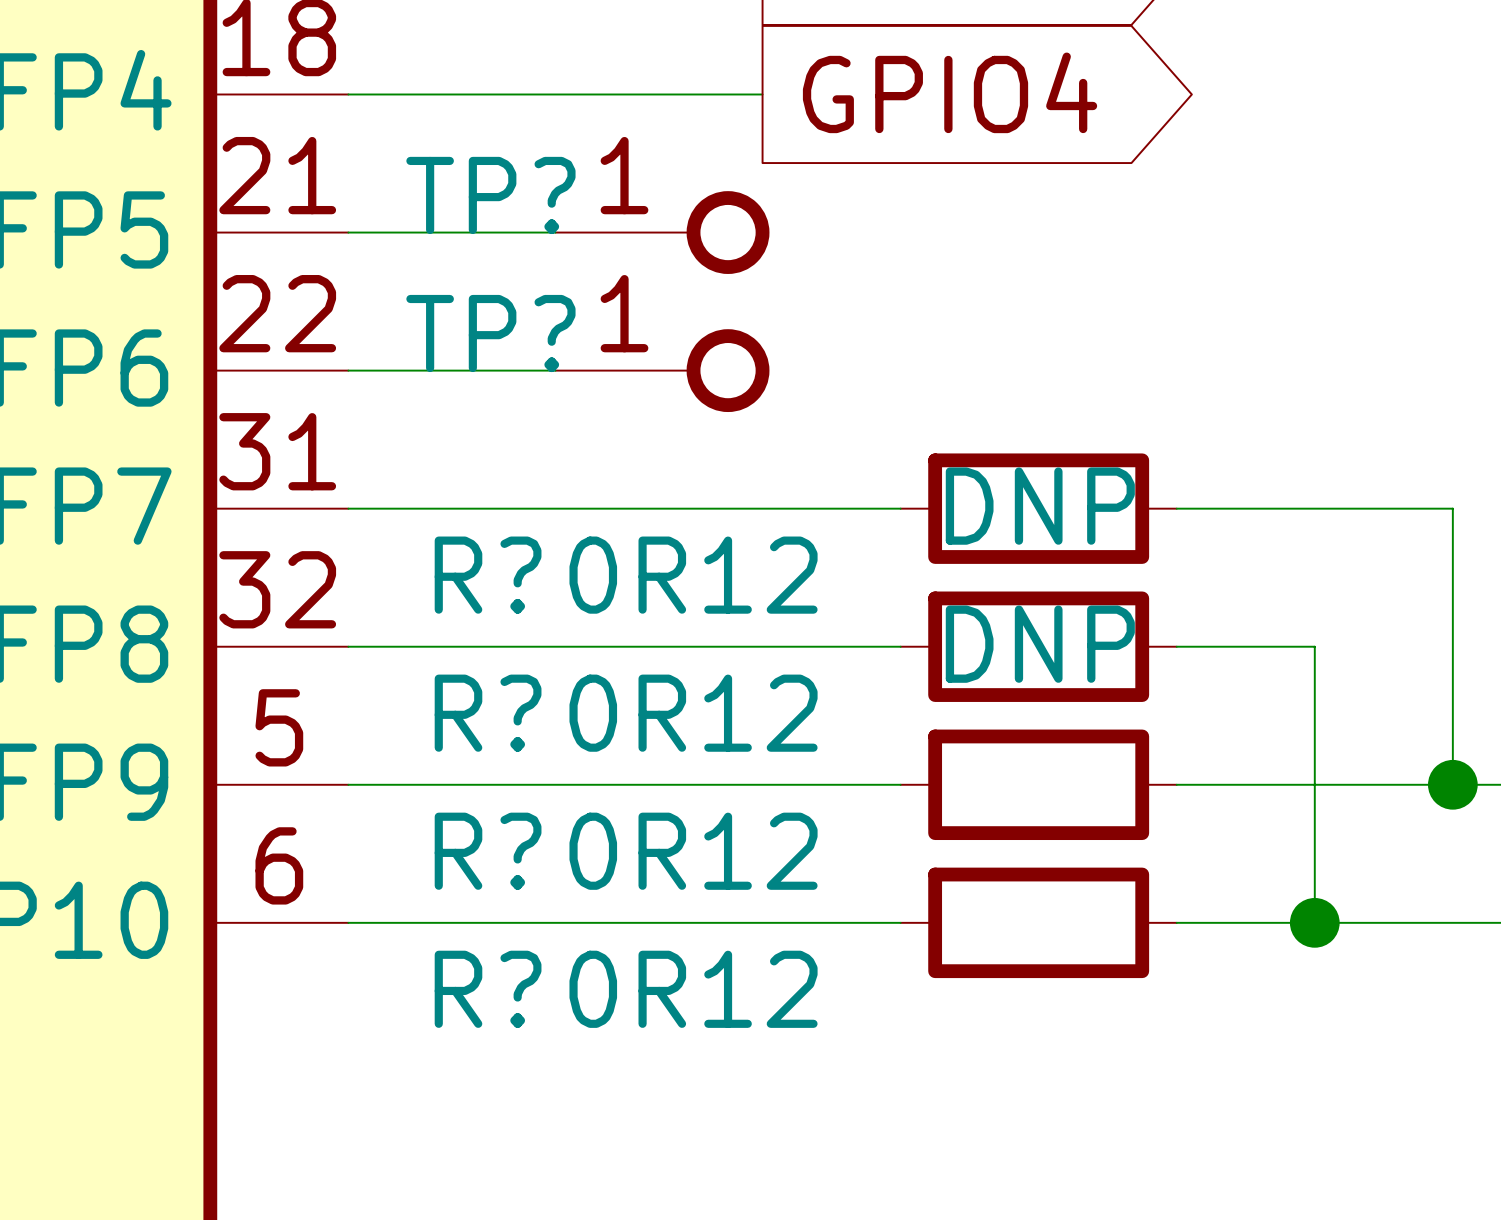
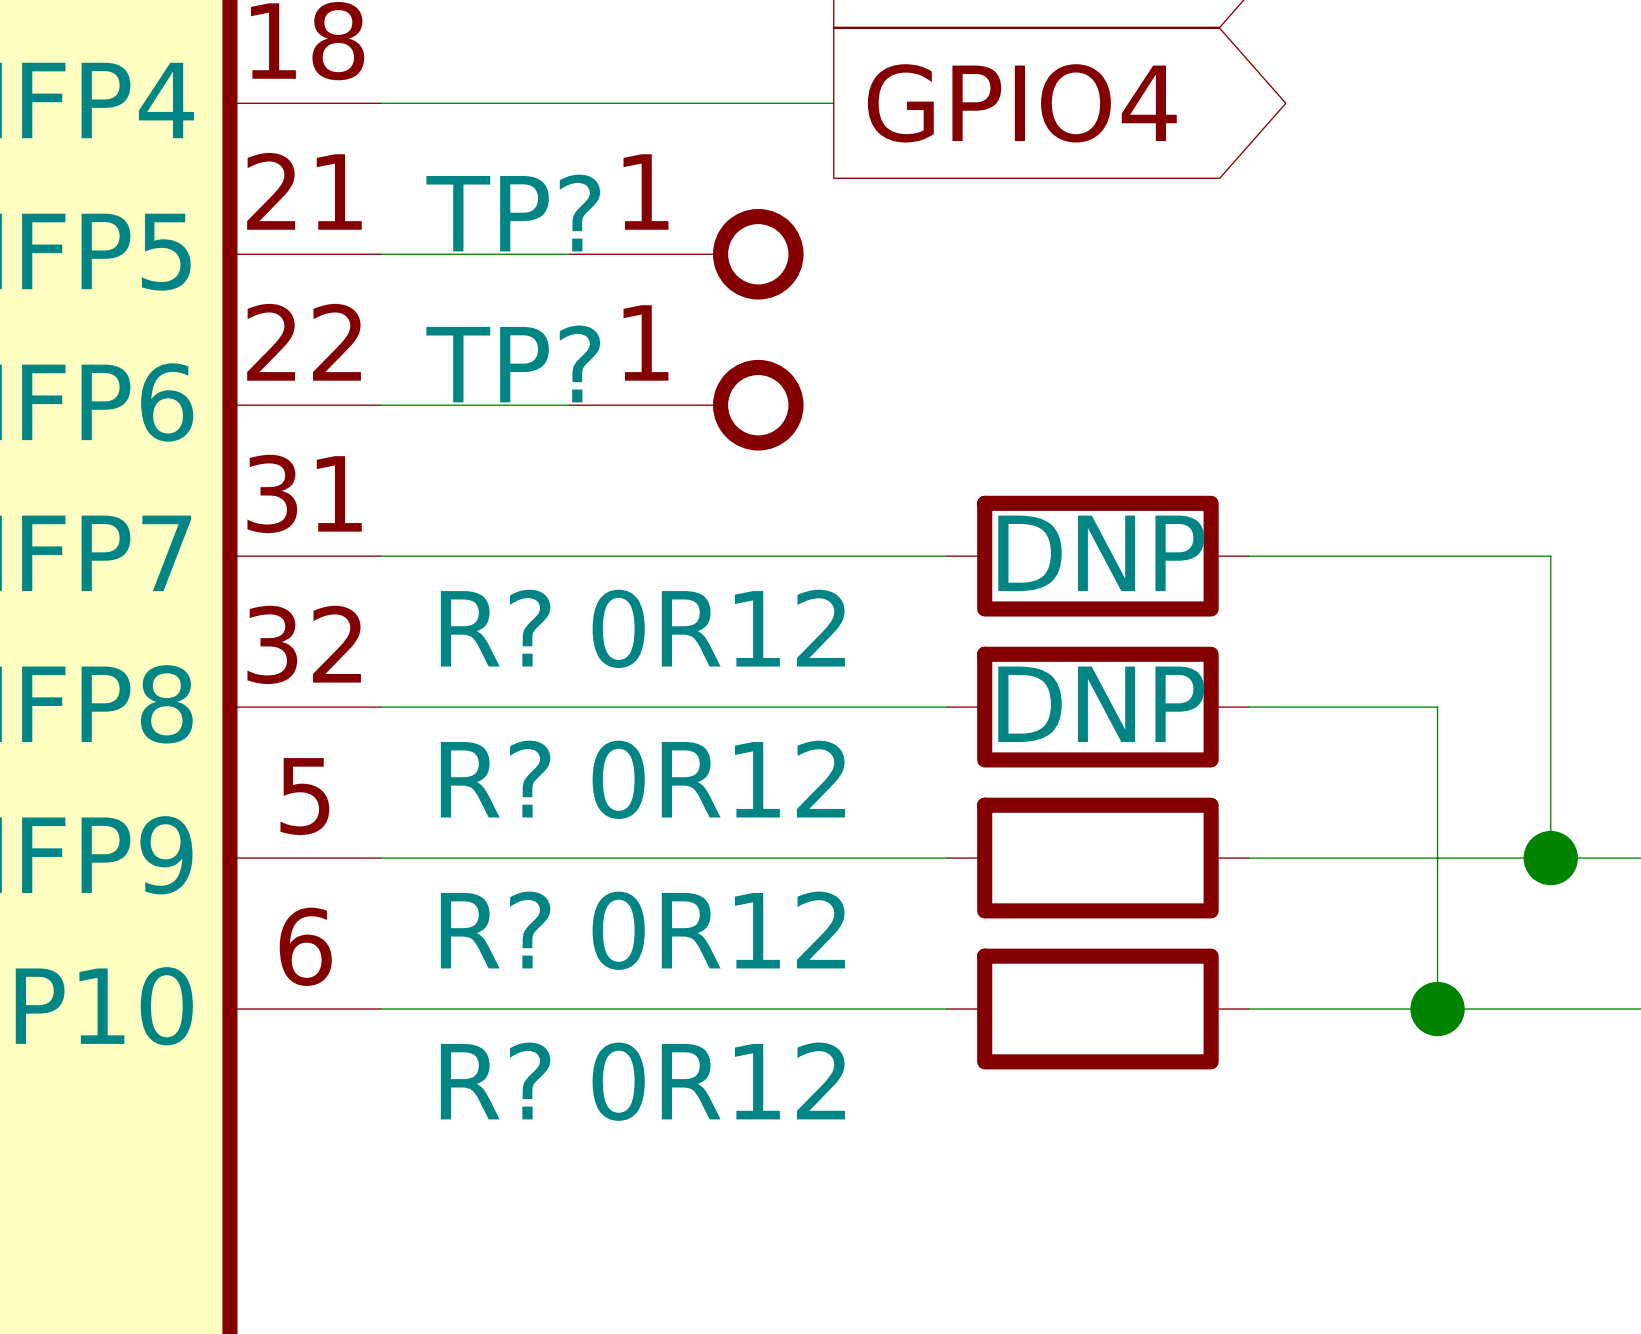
TP? position: (662, 232) -> (686, 254)
TP? position: (662, 370) -> (686, 405)
R? position: (1038, 508) -> (1097, 556)
wire: (1418, 508) (1452, 508) (1452, 784) -> (1550, 556) (1550, 858)
R? position: (1038, 646) -> (1097, 707)
R? position: (1038, 784) -> (1097, 858)
junction position: (1452, 784) -> (1550, 858)
R? position: (1038, 922) -> (1097, 1009)

